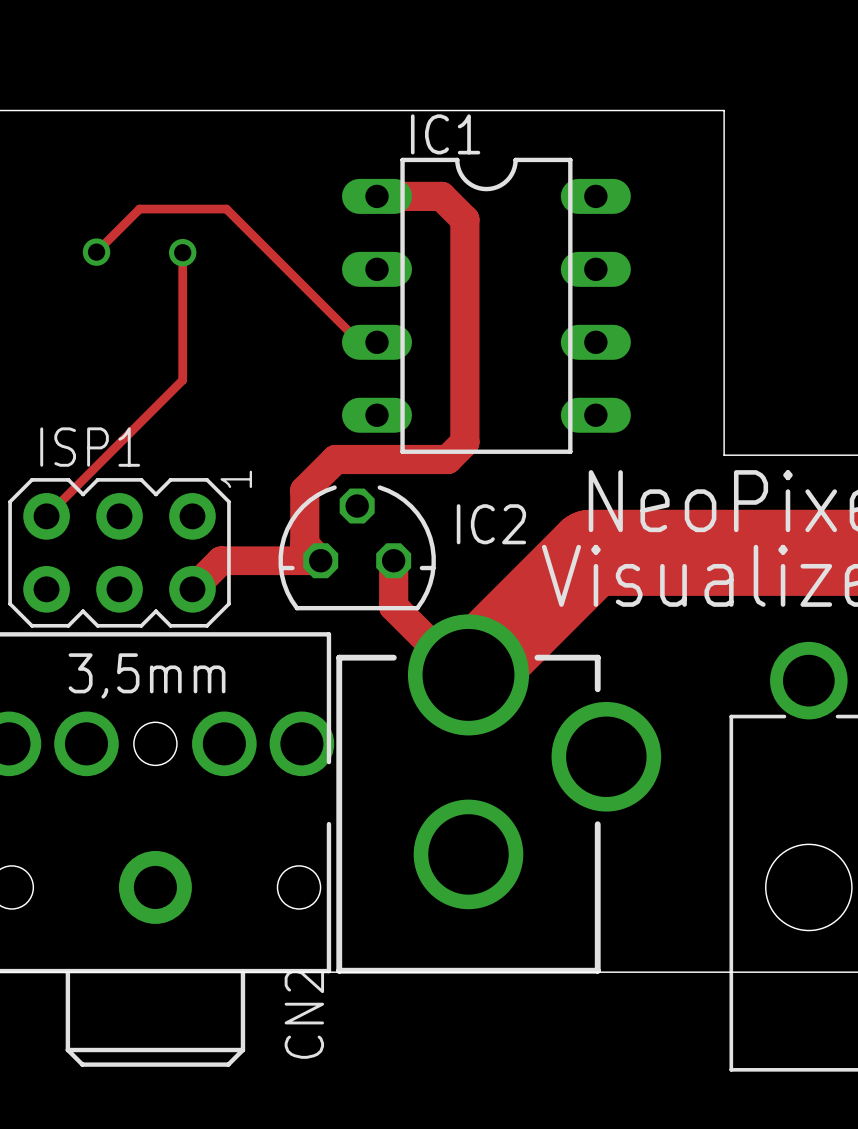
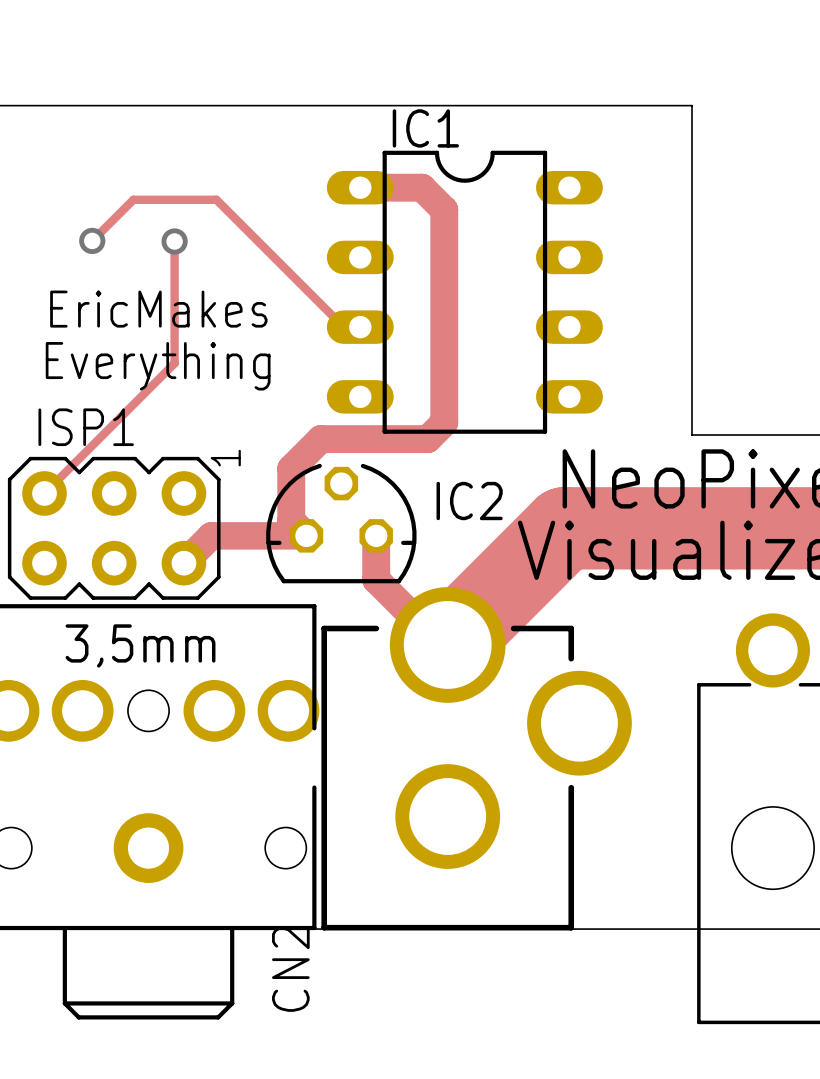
text: none -> EricMakes (158, 309)
text: none -> Everything (158, 366)

